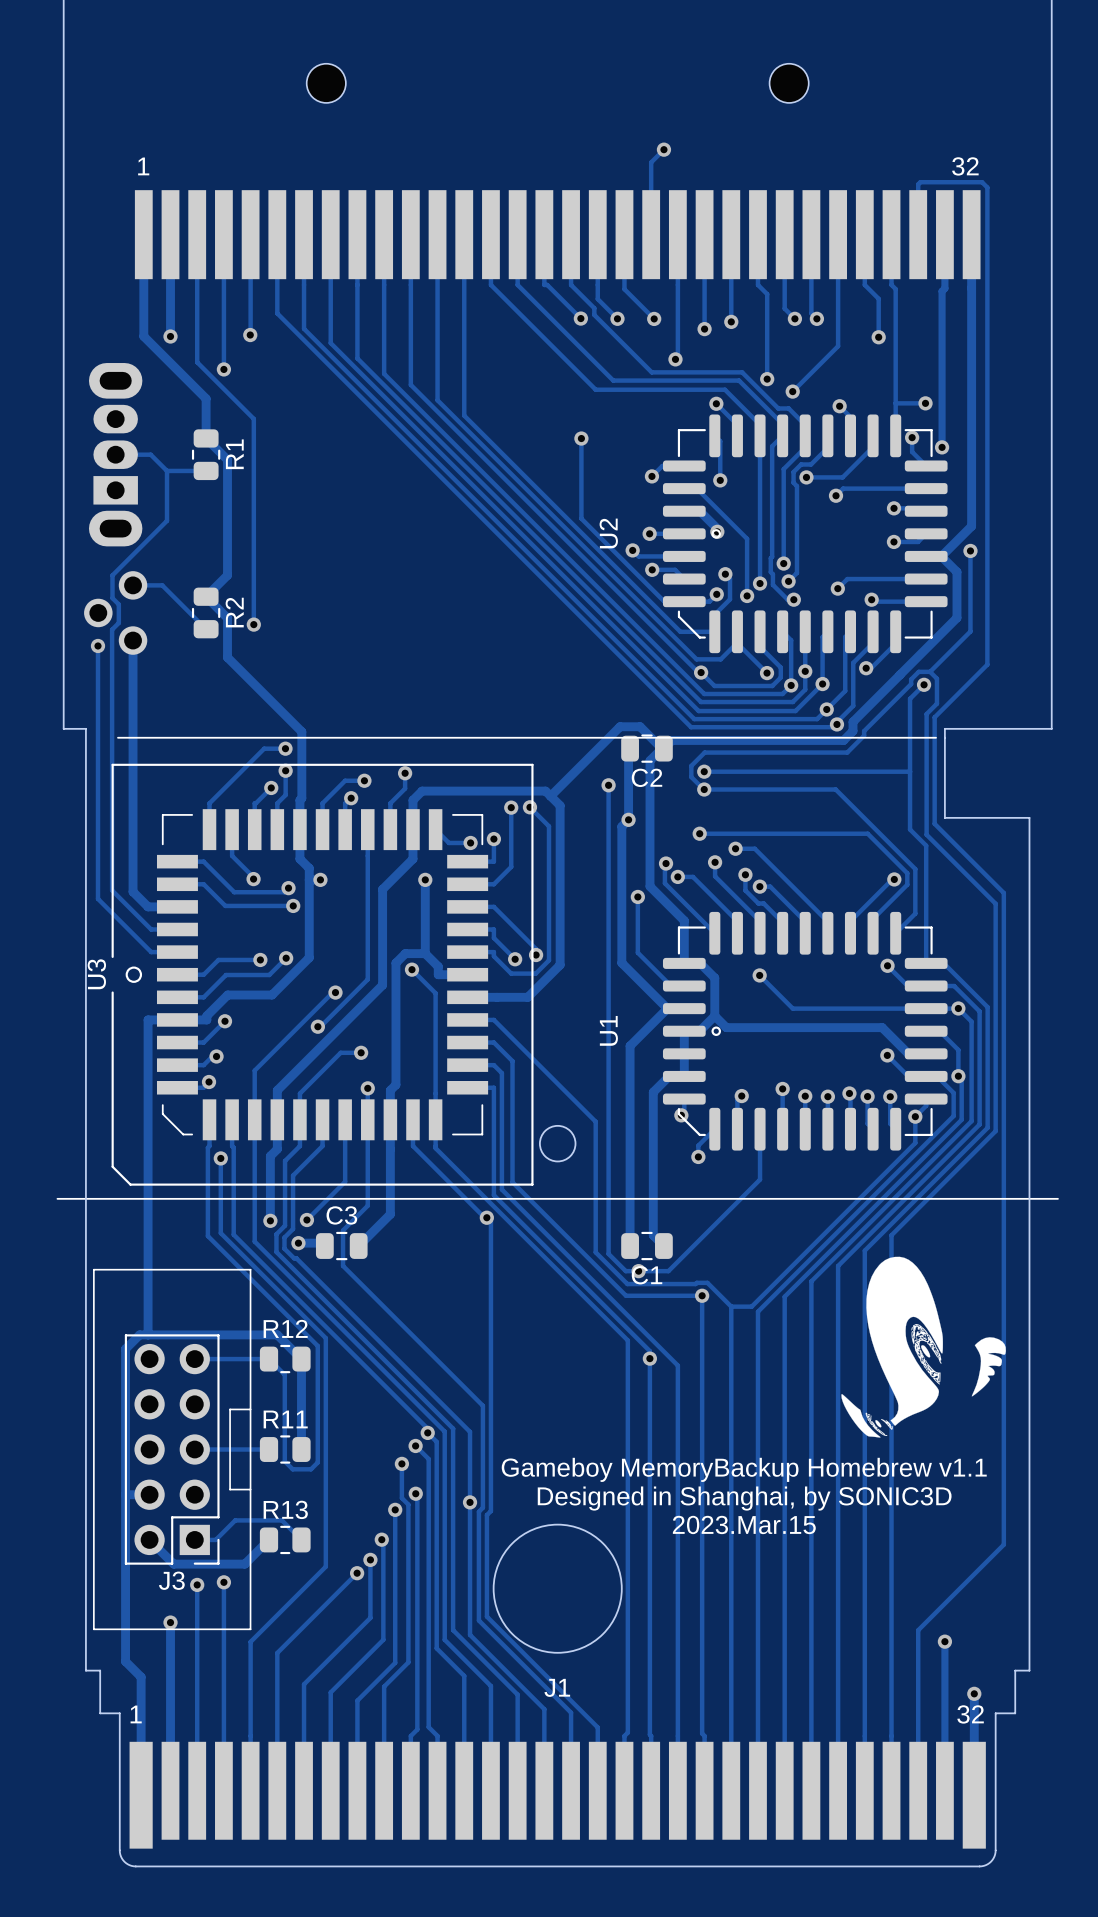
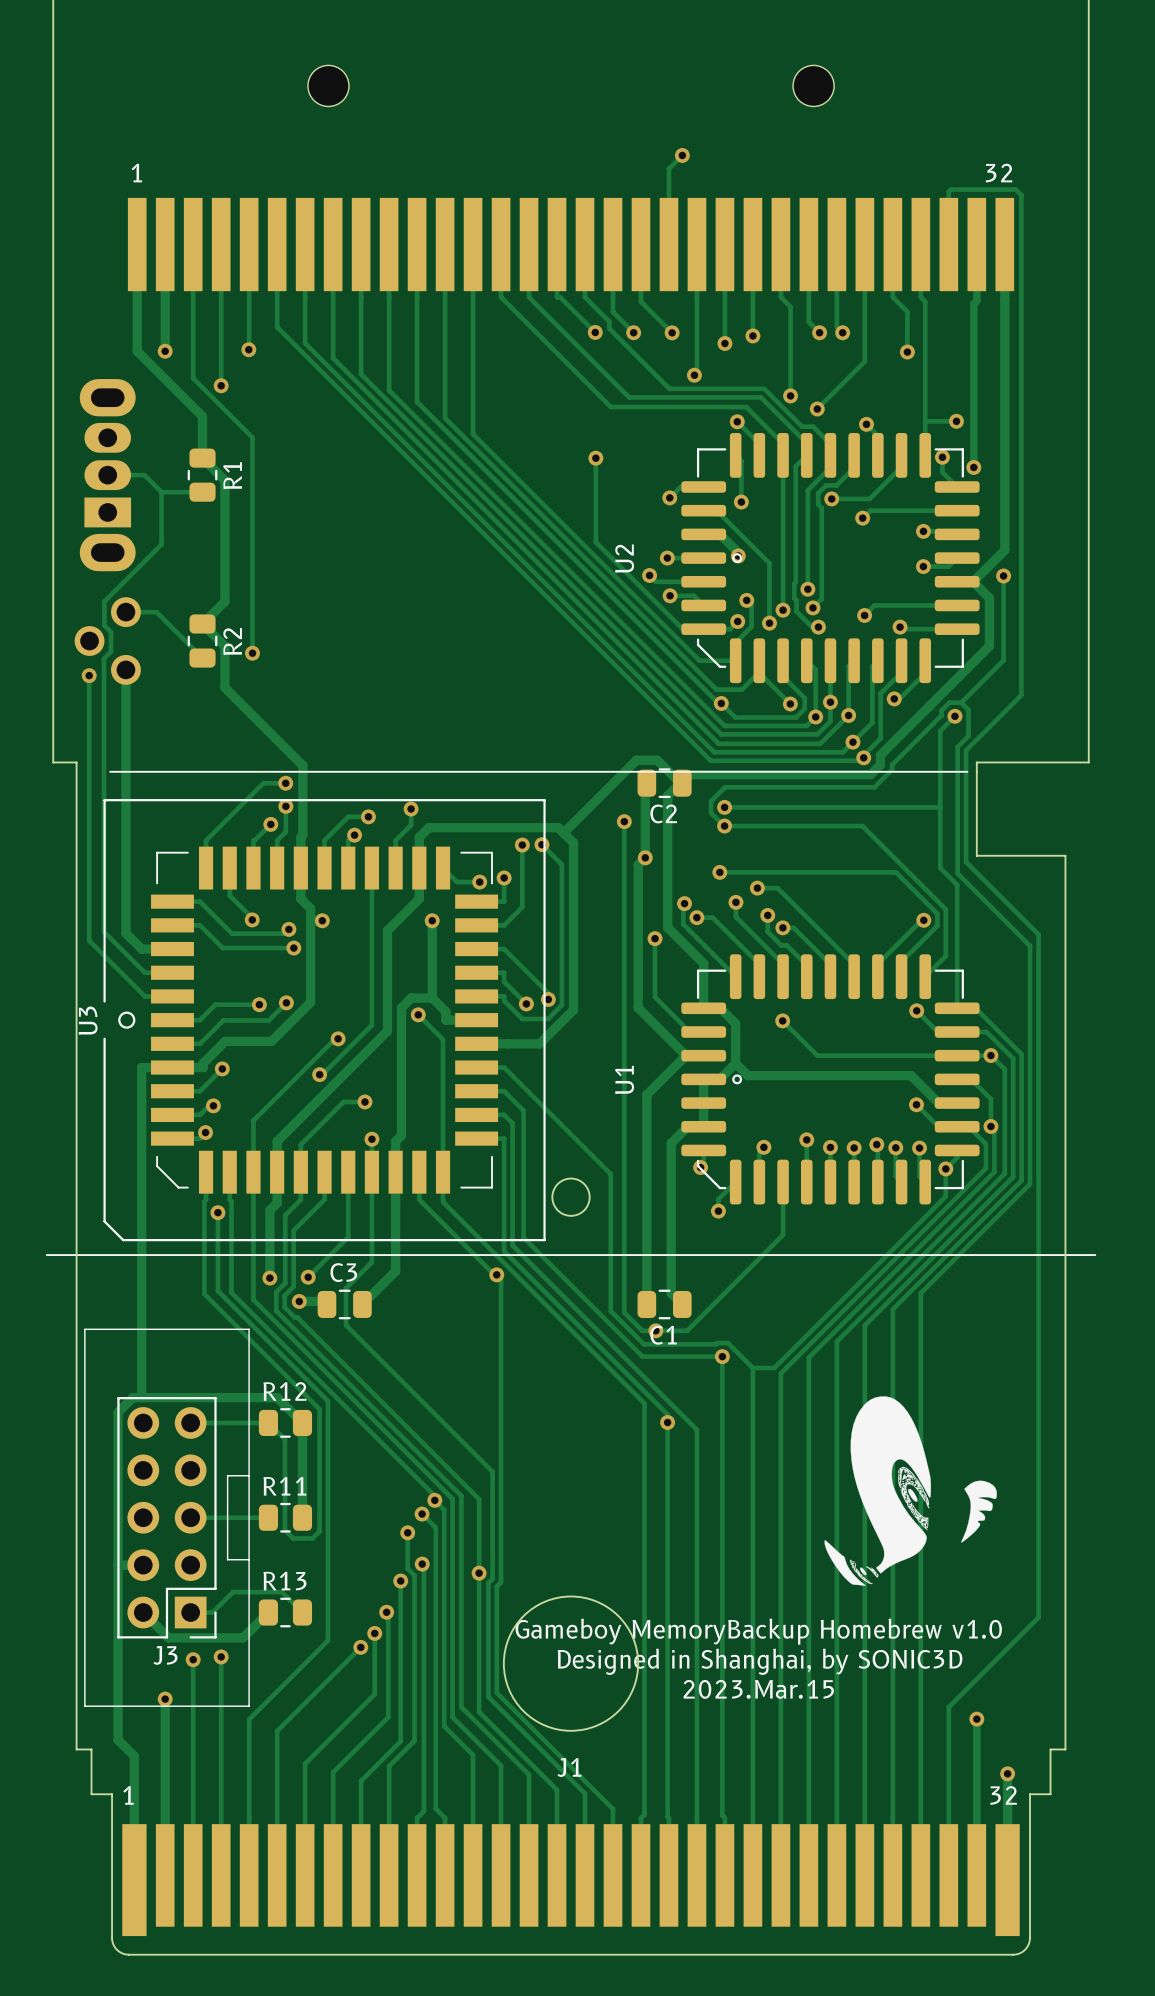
drawing position: (923, 1347) -> (910, 1491)
text: Gameboy MemoryBackup Homebrew v1.1 (744, 1469) -> none
text position: Designed in Shanghai, by SONIC3D (744, 1498) -> Designed in Shanghai, by SONIC3D (760, 1661)
text position: 2023.Mar.15 (744, 1524) -> 2023.Mar.15 (758, 1689)
text: none -> Gameboy MemoryBackup Homebrew v1.0 (758, 1631)

